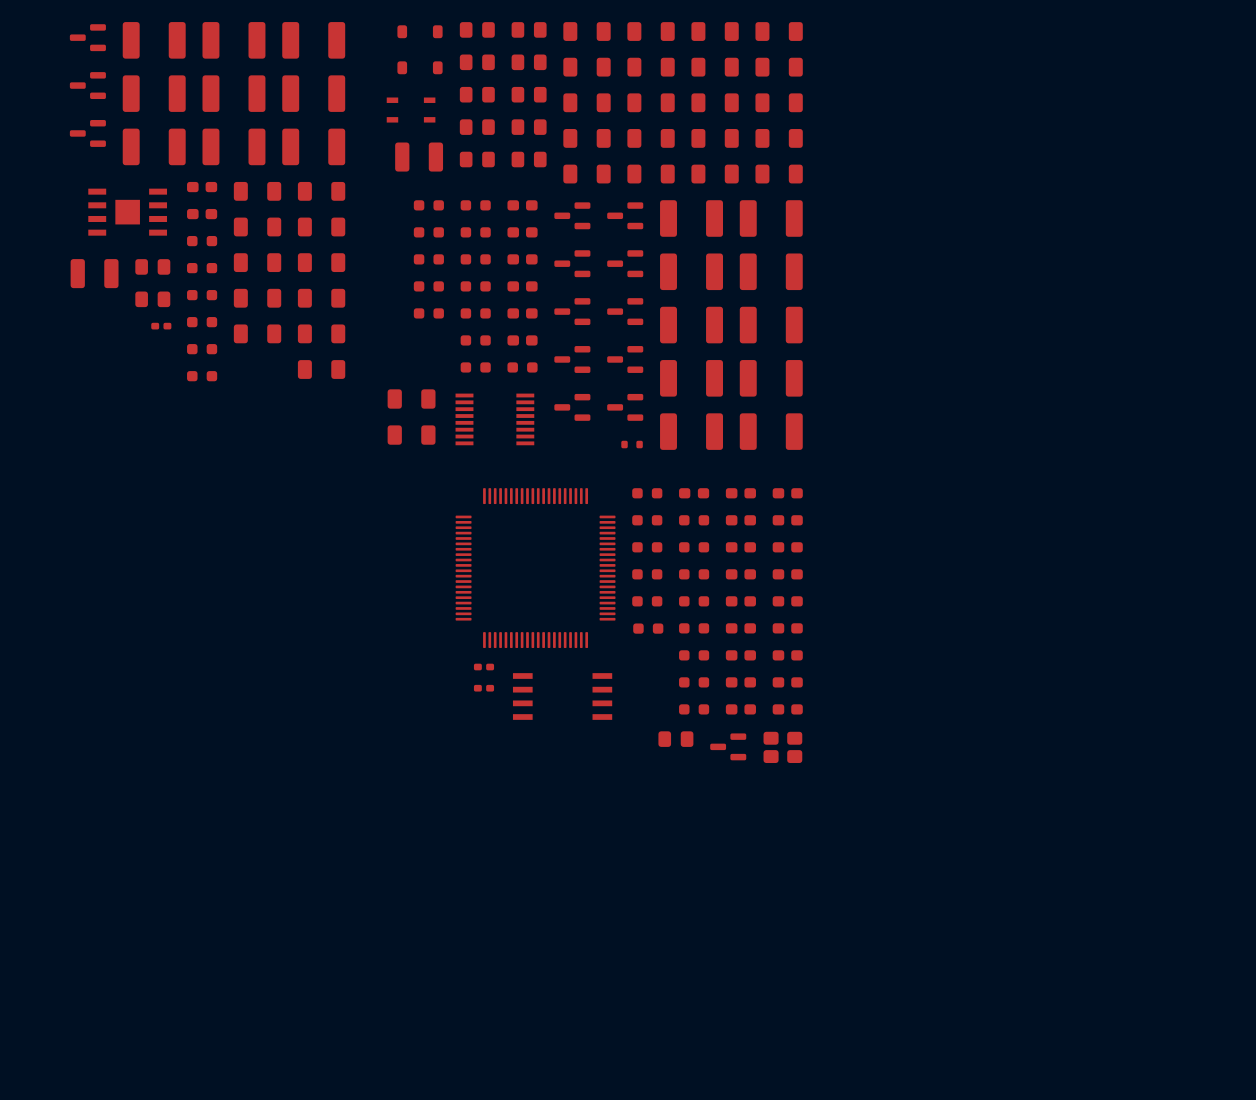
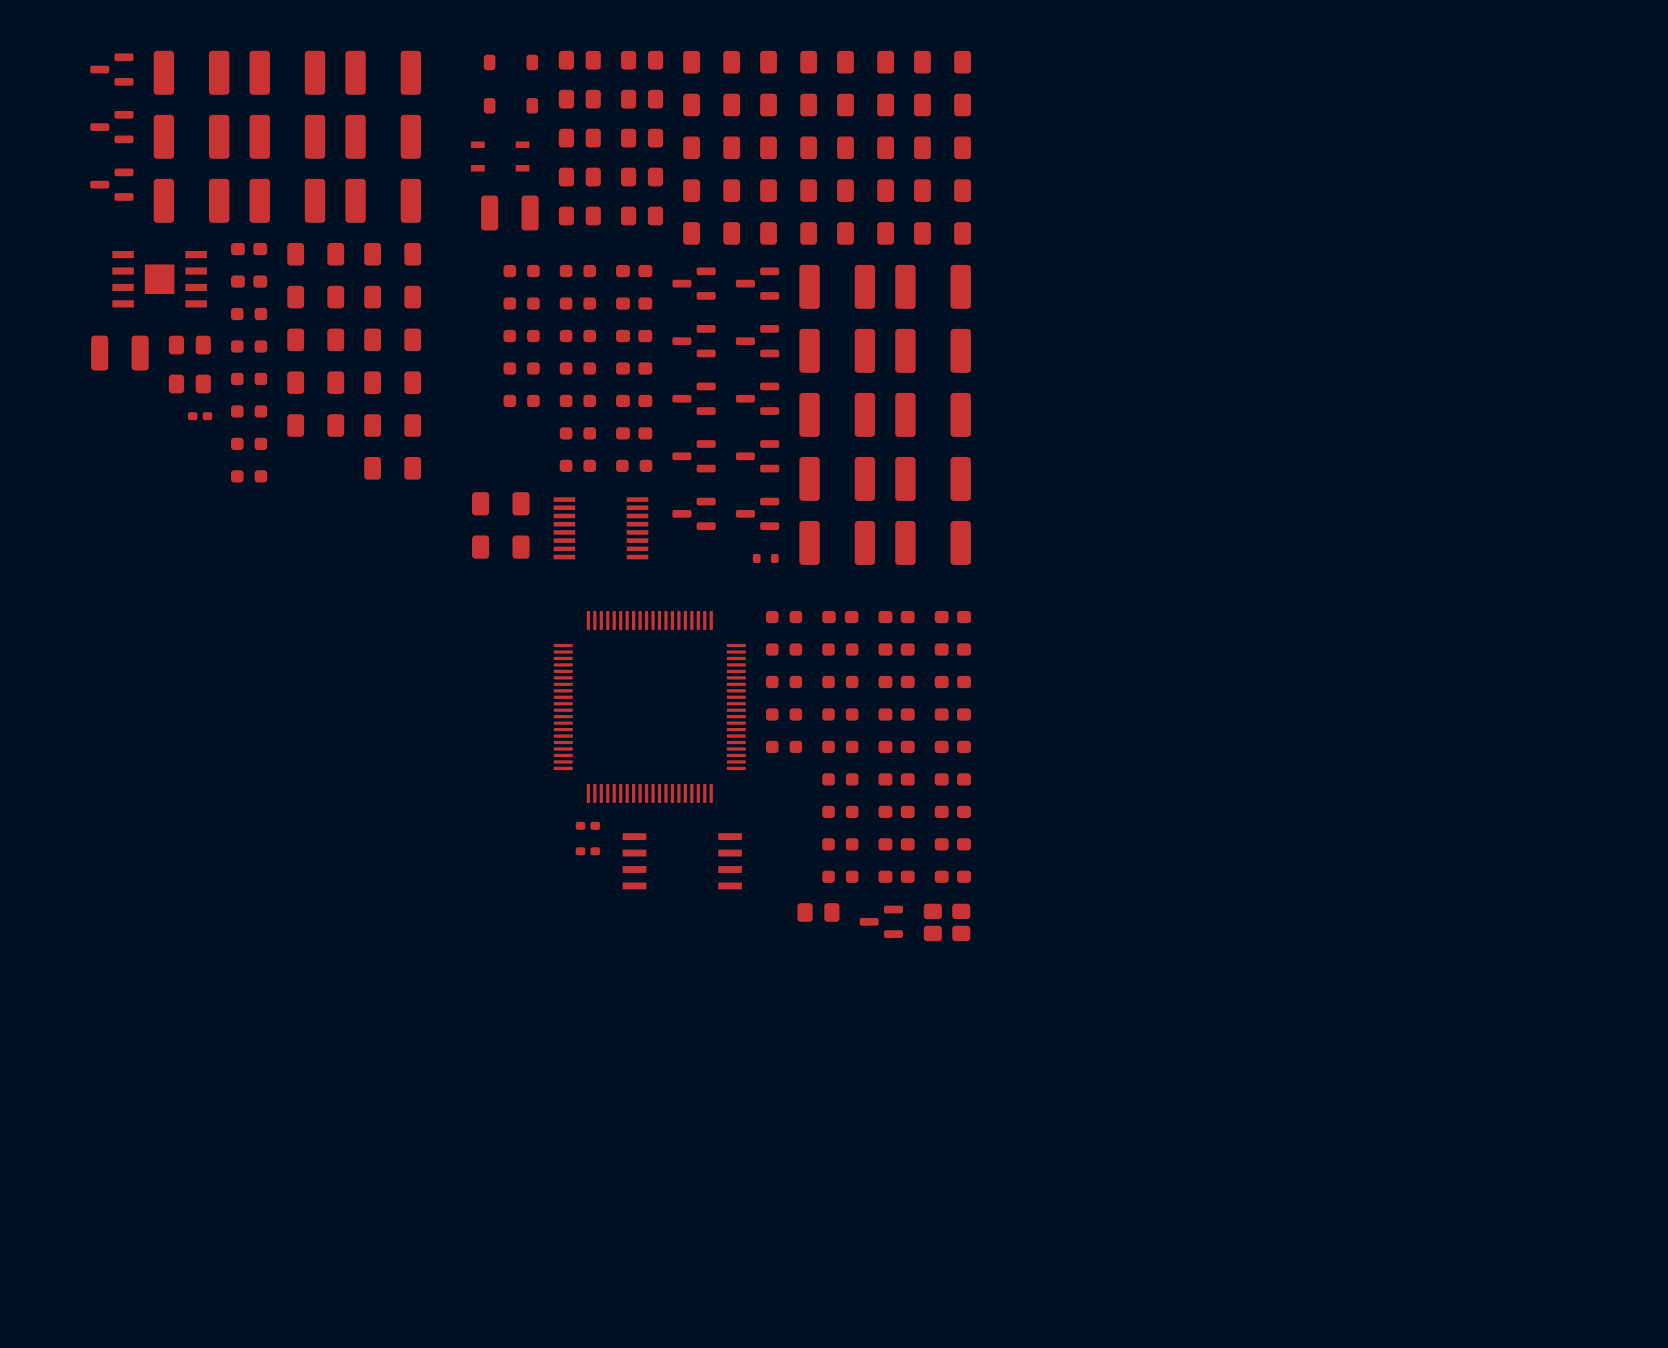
part: (648, 628) -> none

